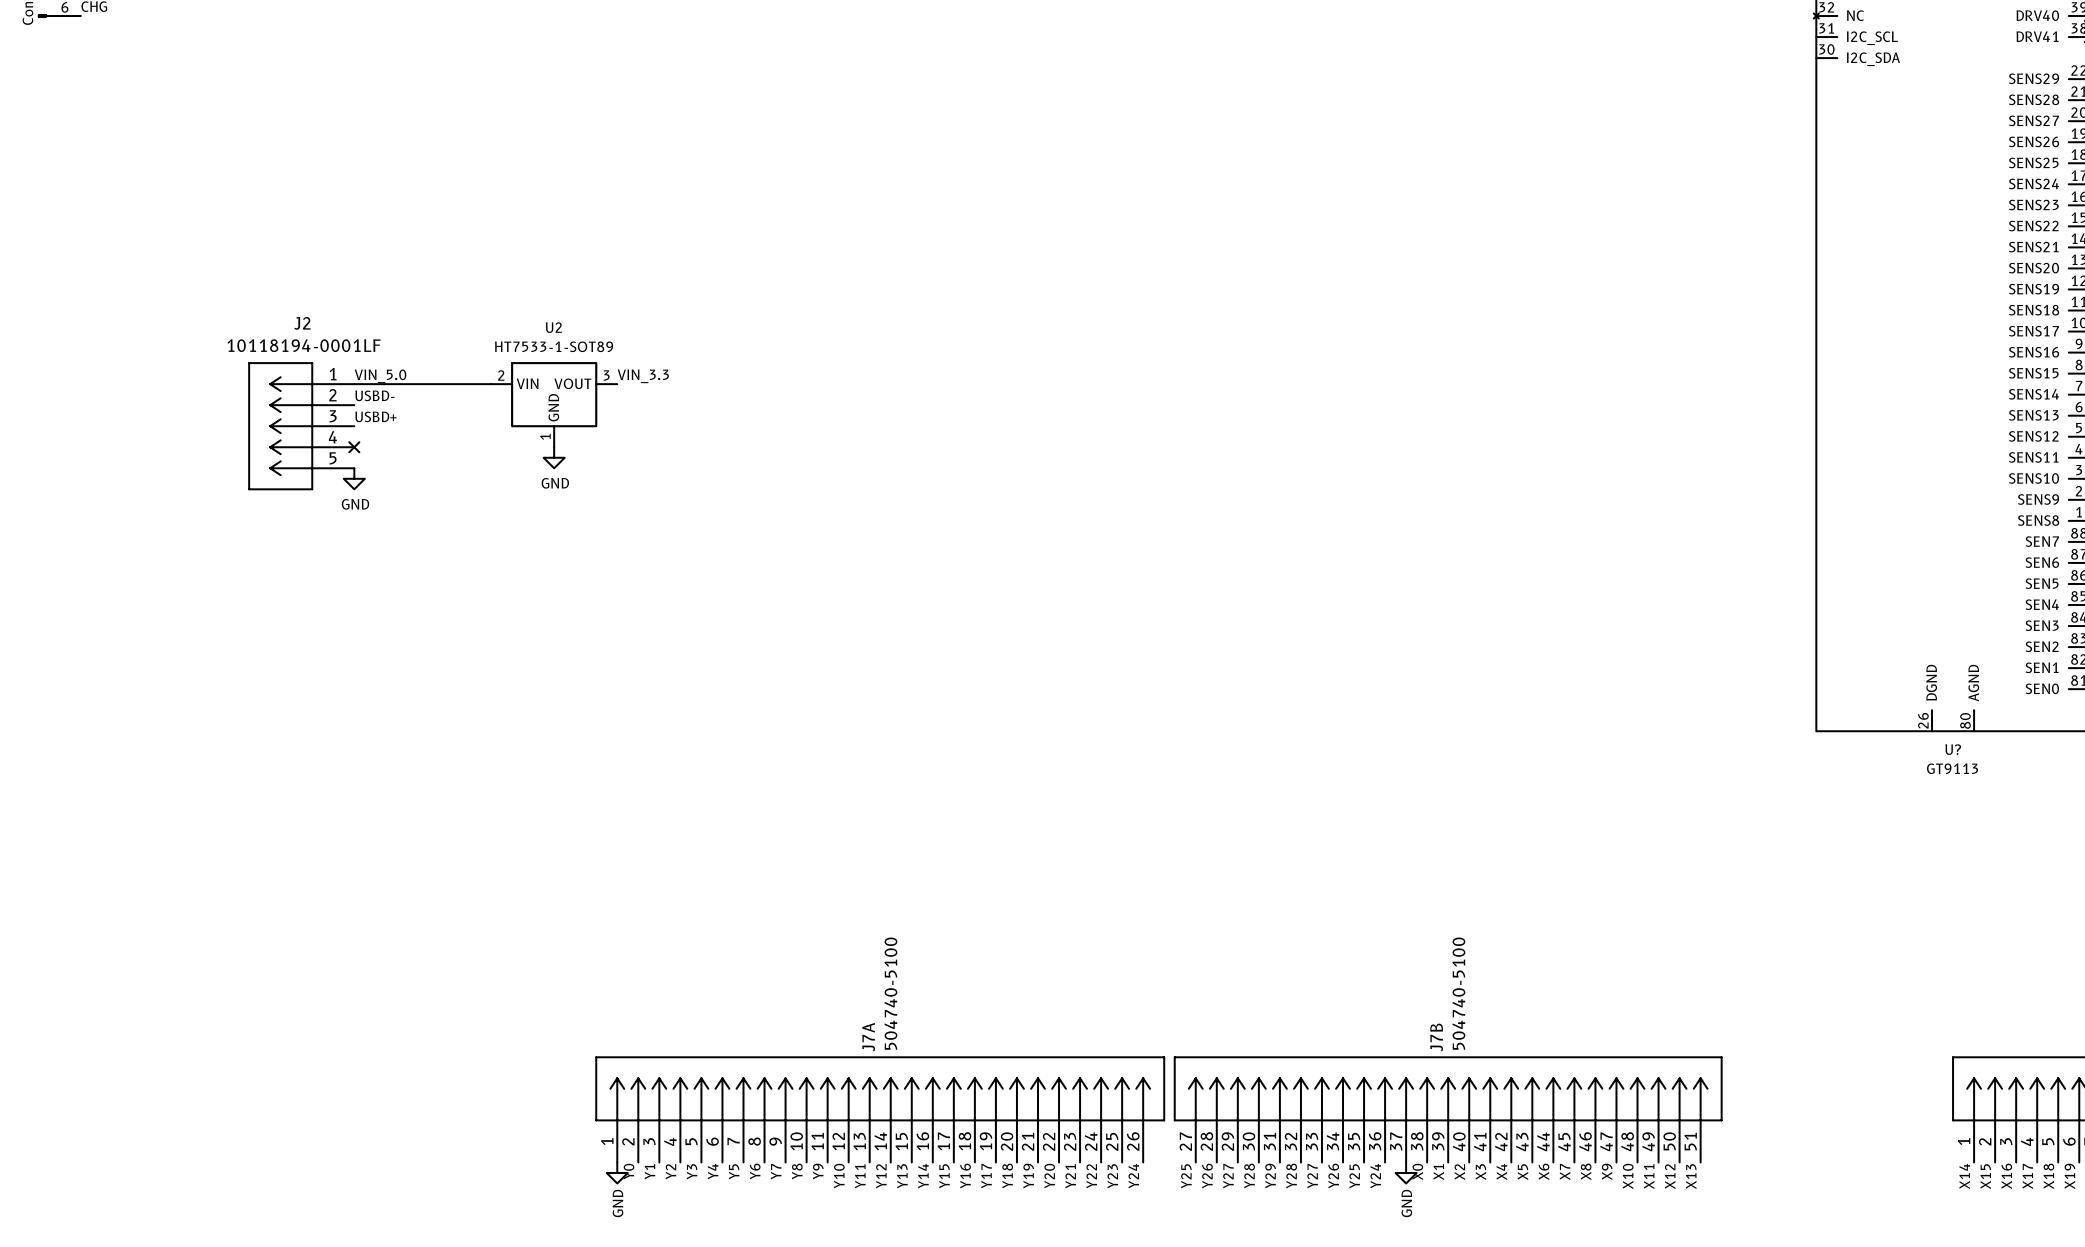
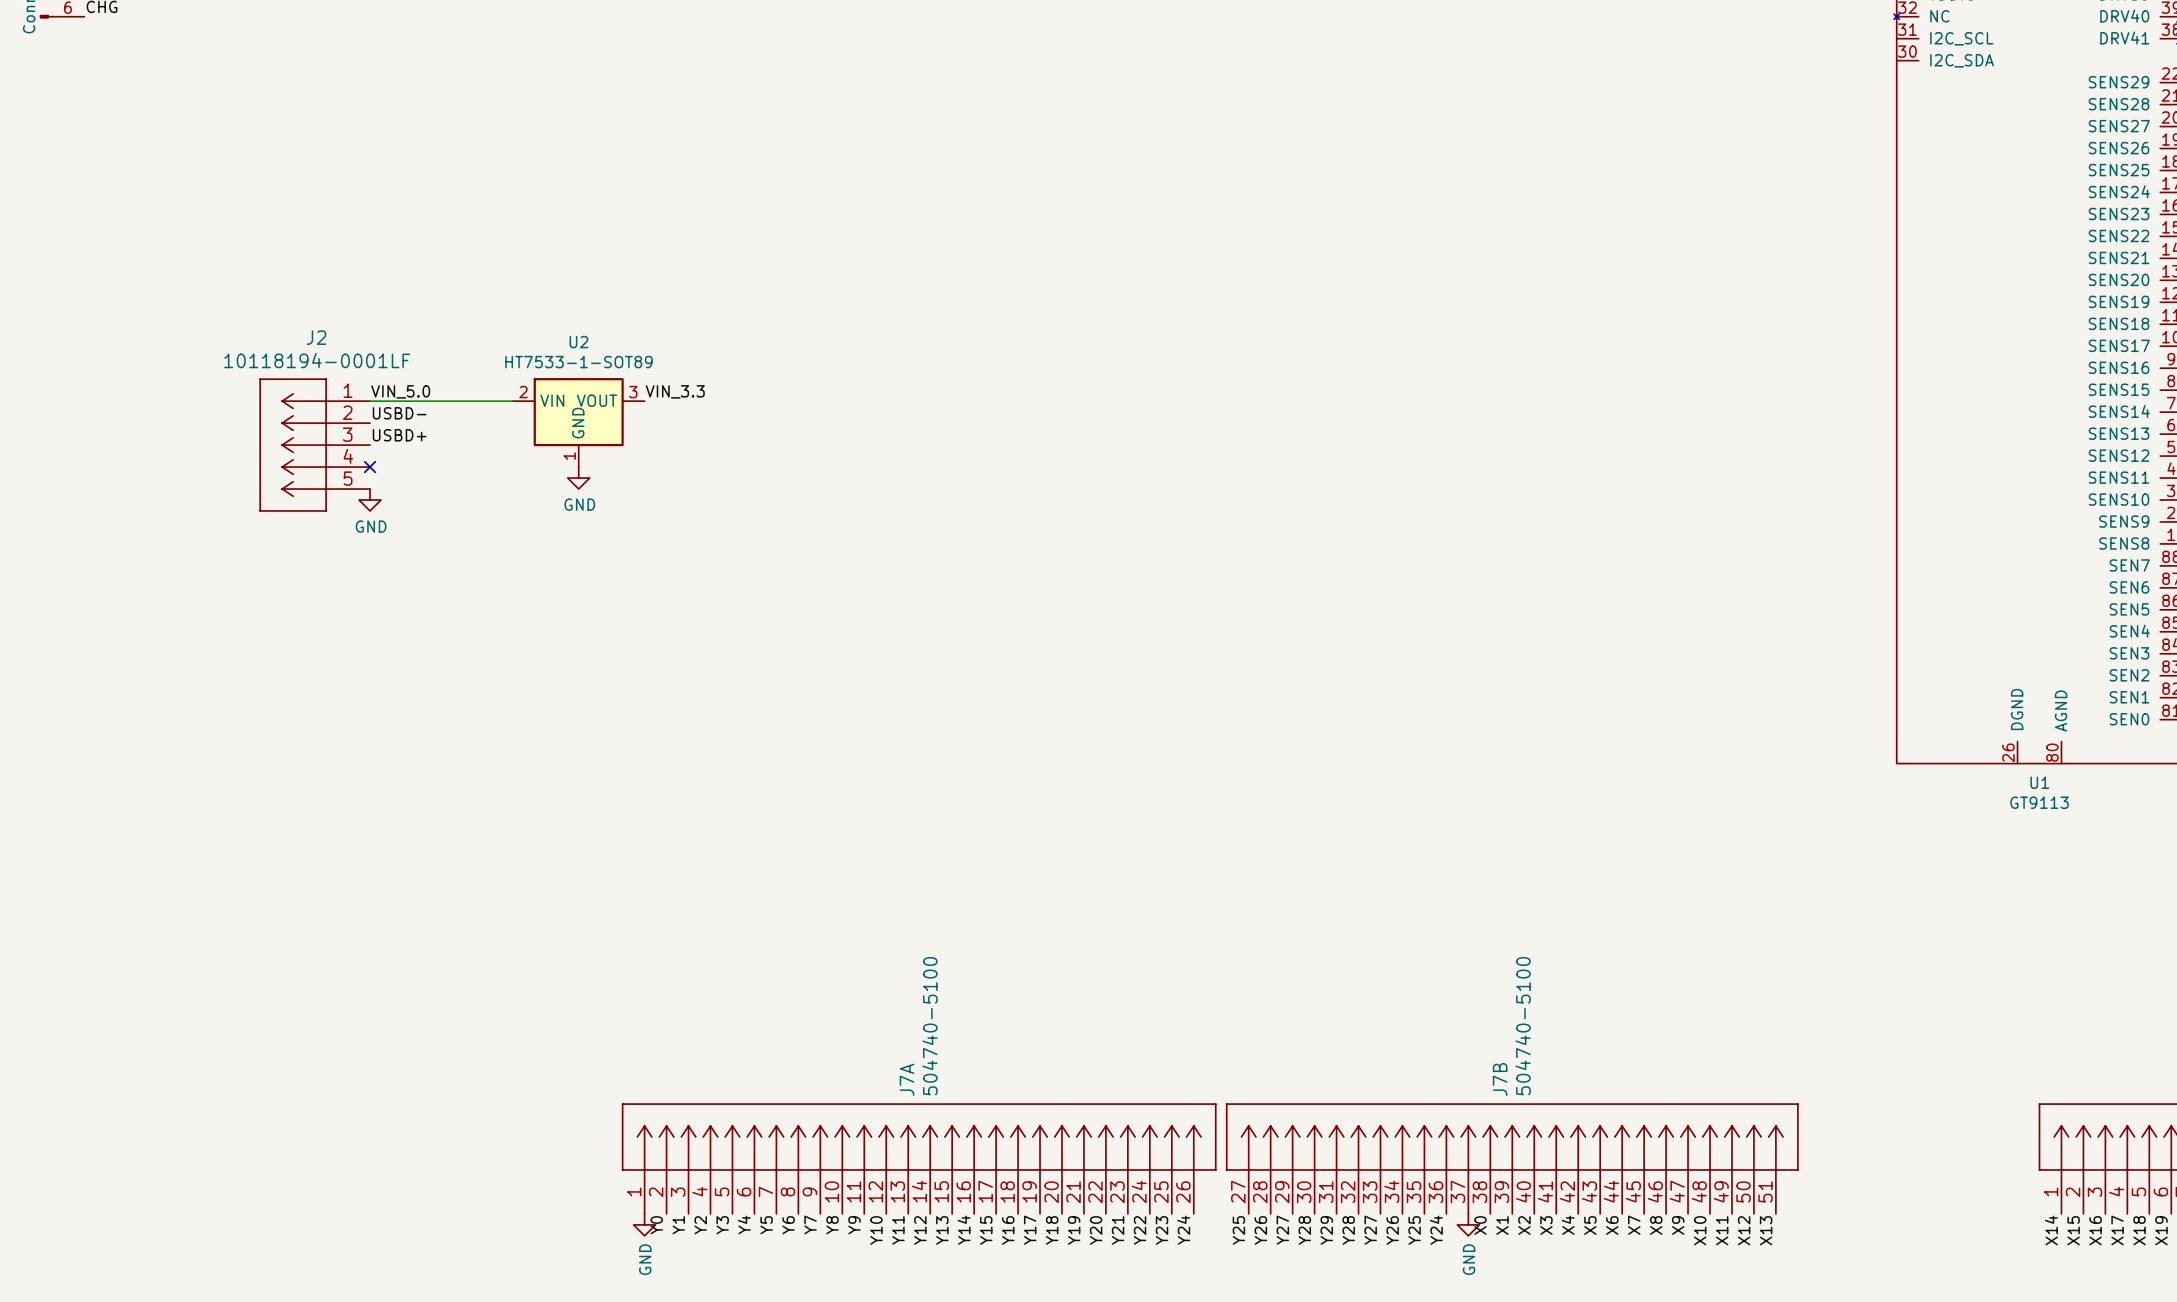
U? name: U? (1953, 749) -> U1 (2039, 782)

